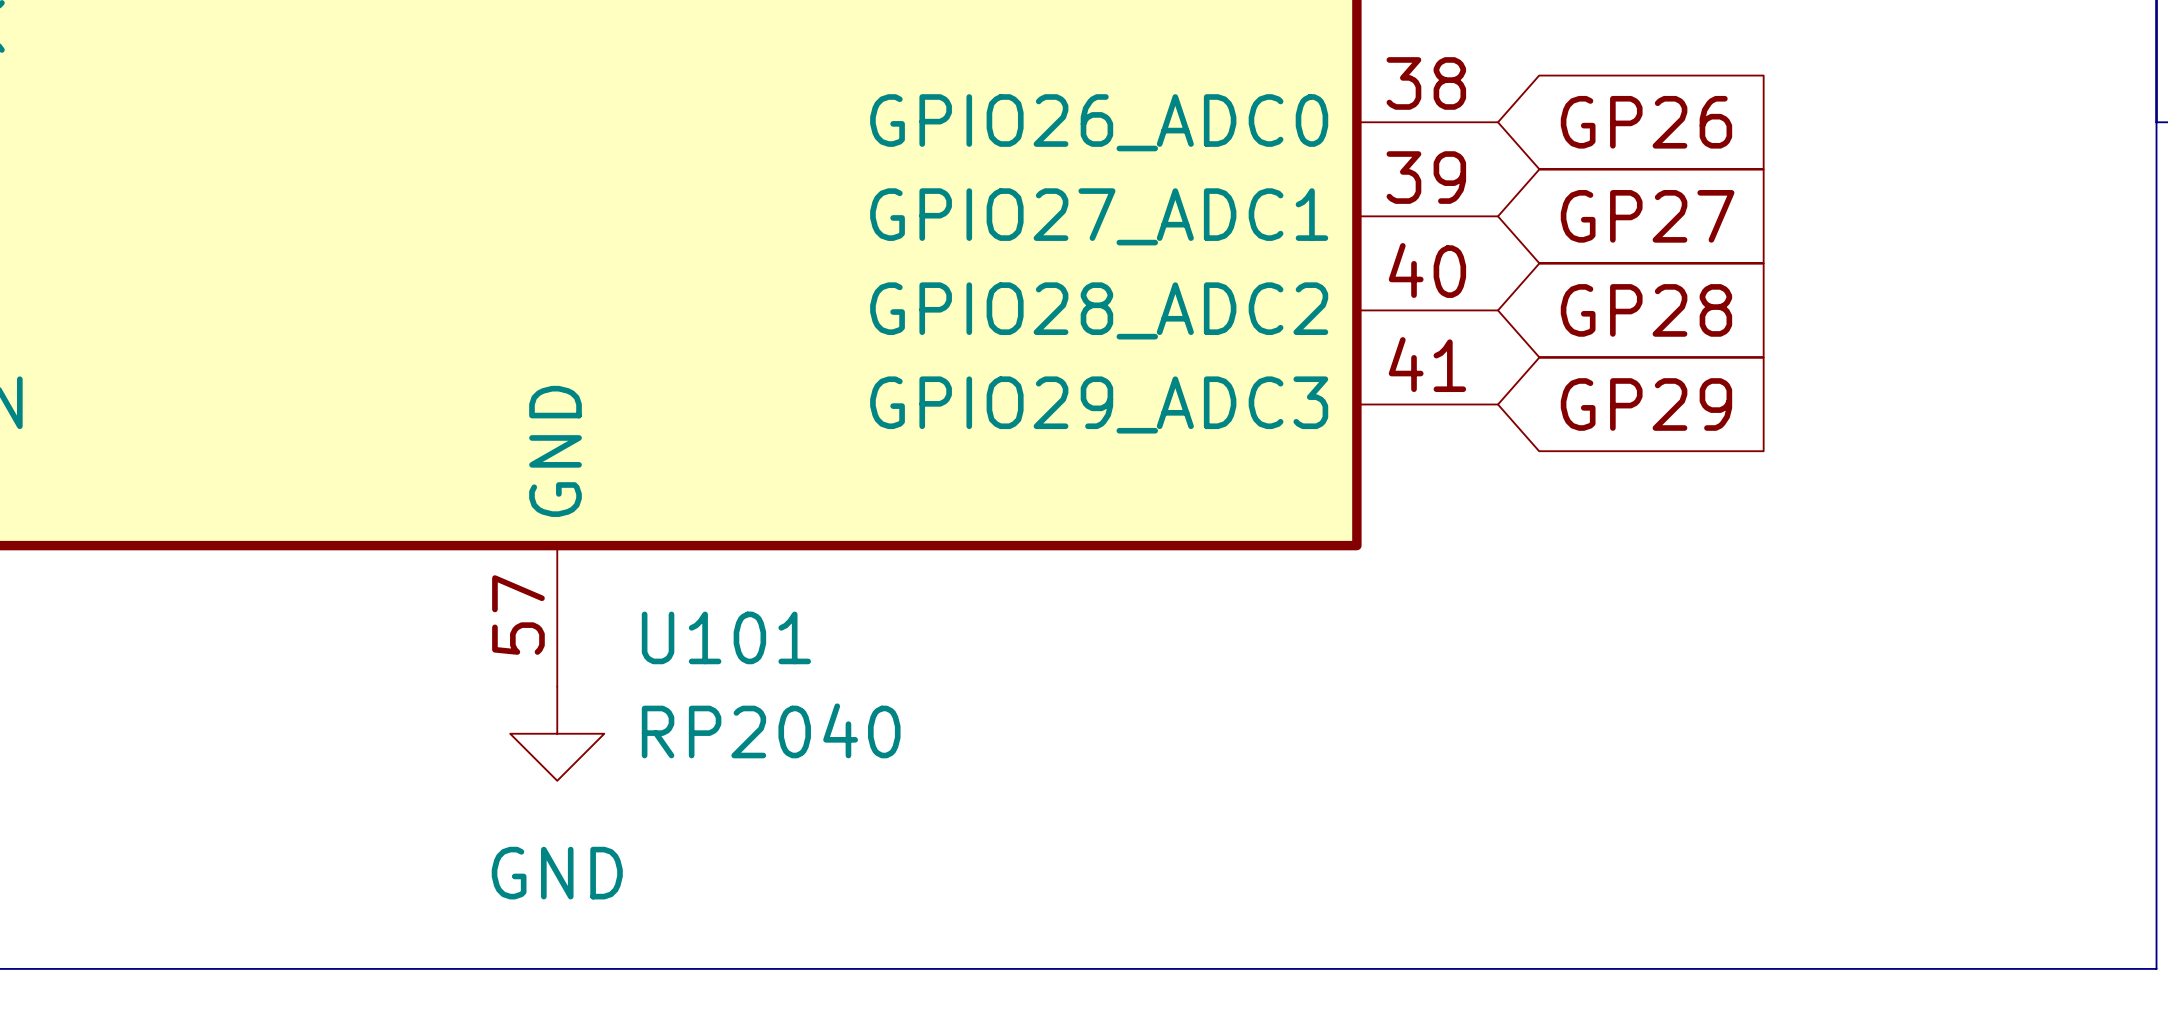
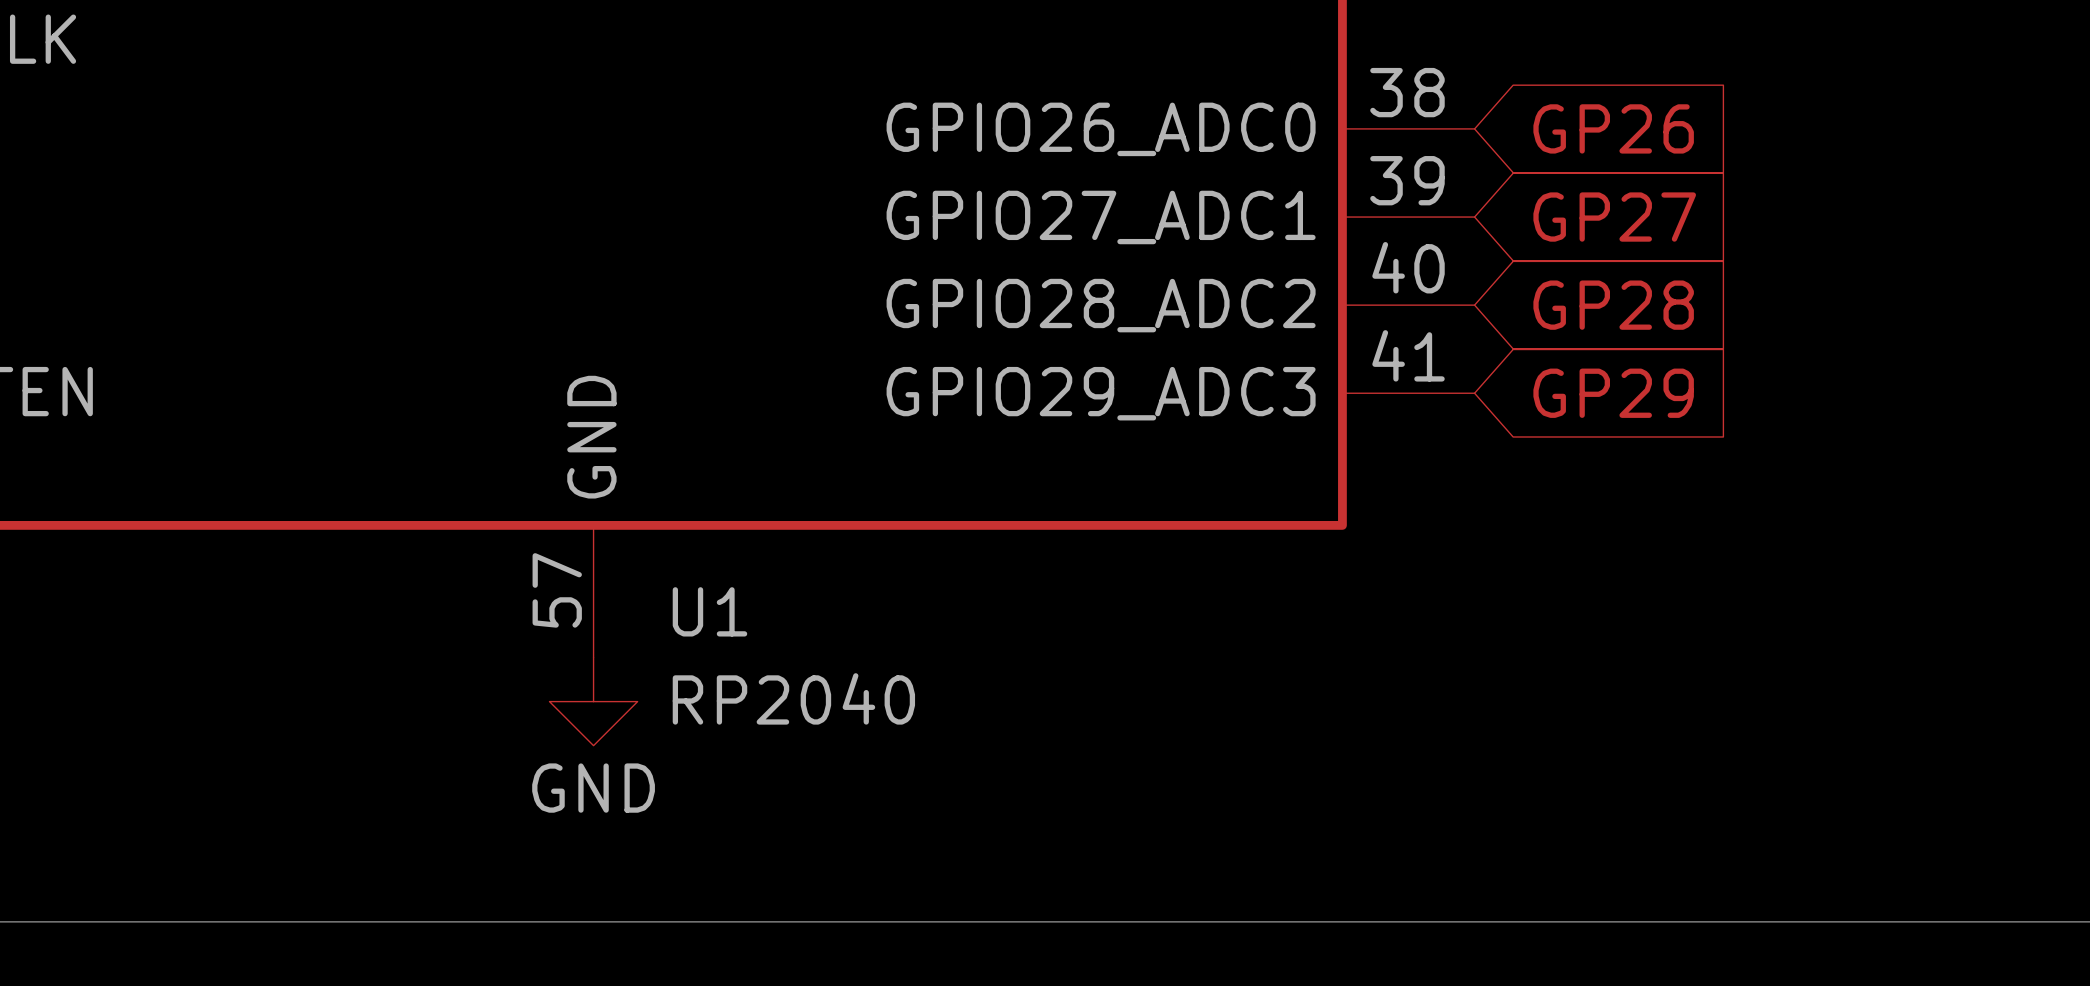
U101 name: U101 (726, 637) -> U1 (709, 611)
power symbol text position: GND (557, 873) -> GND (593, 788)

